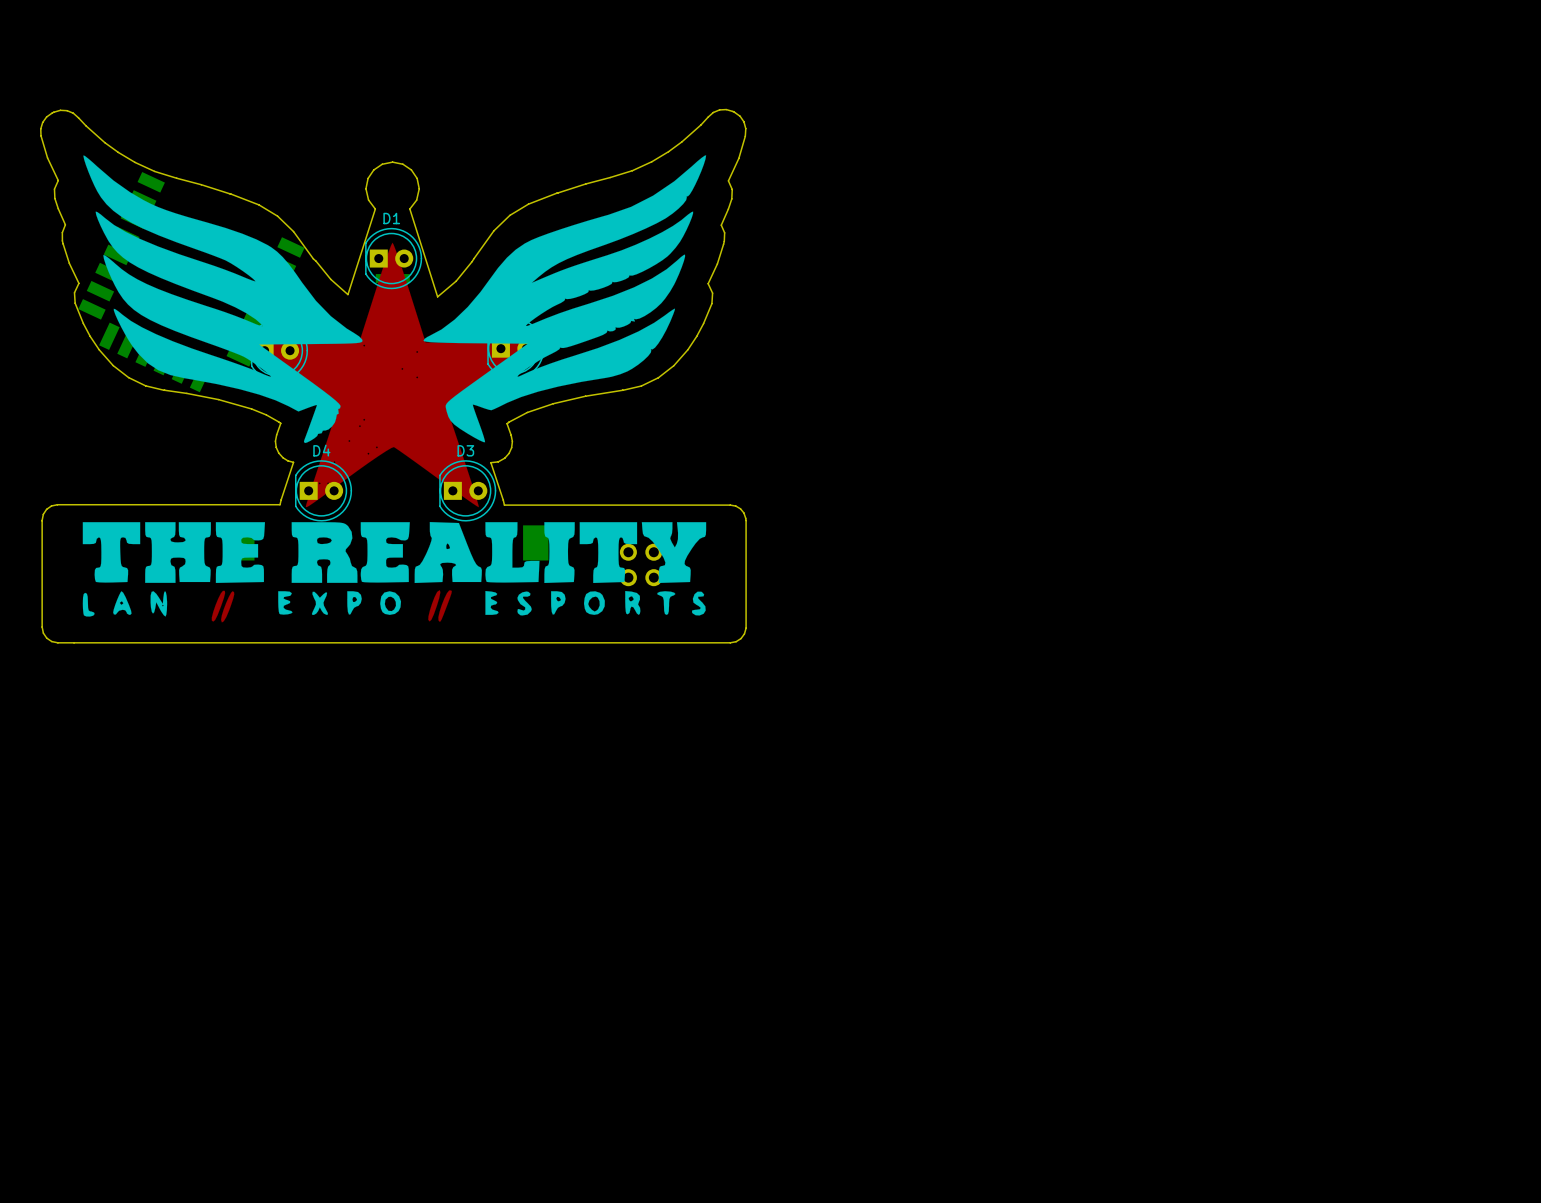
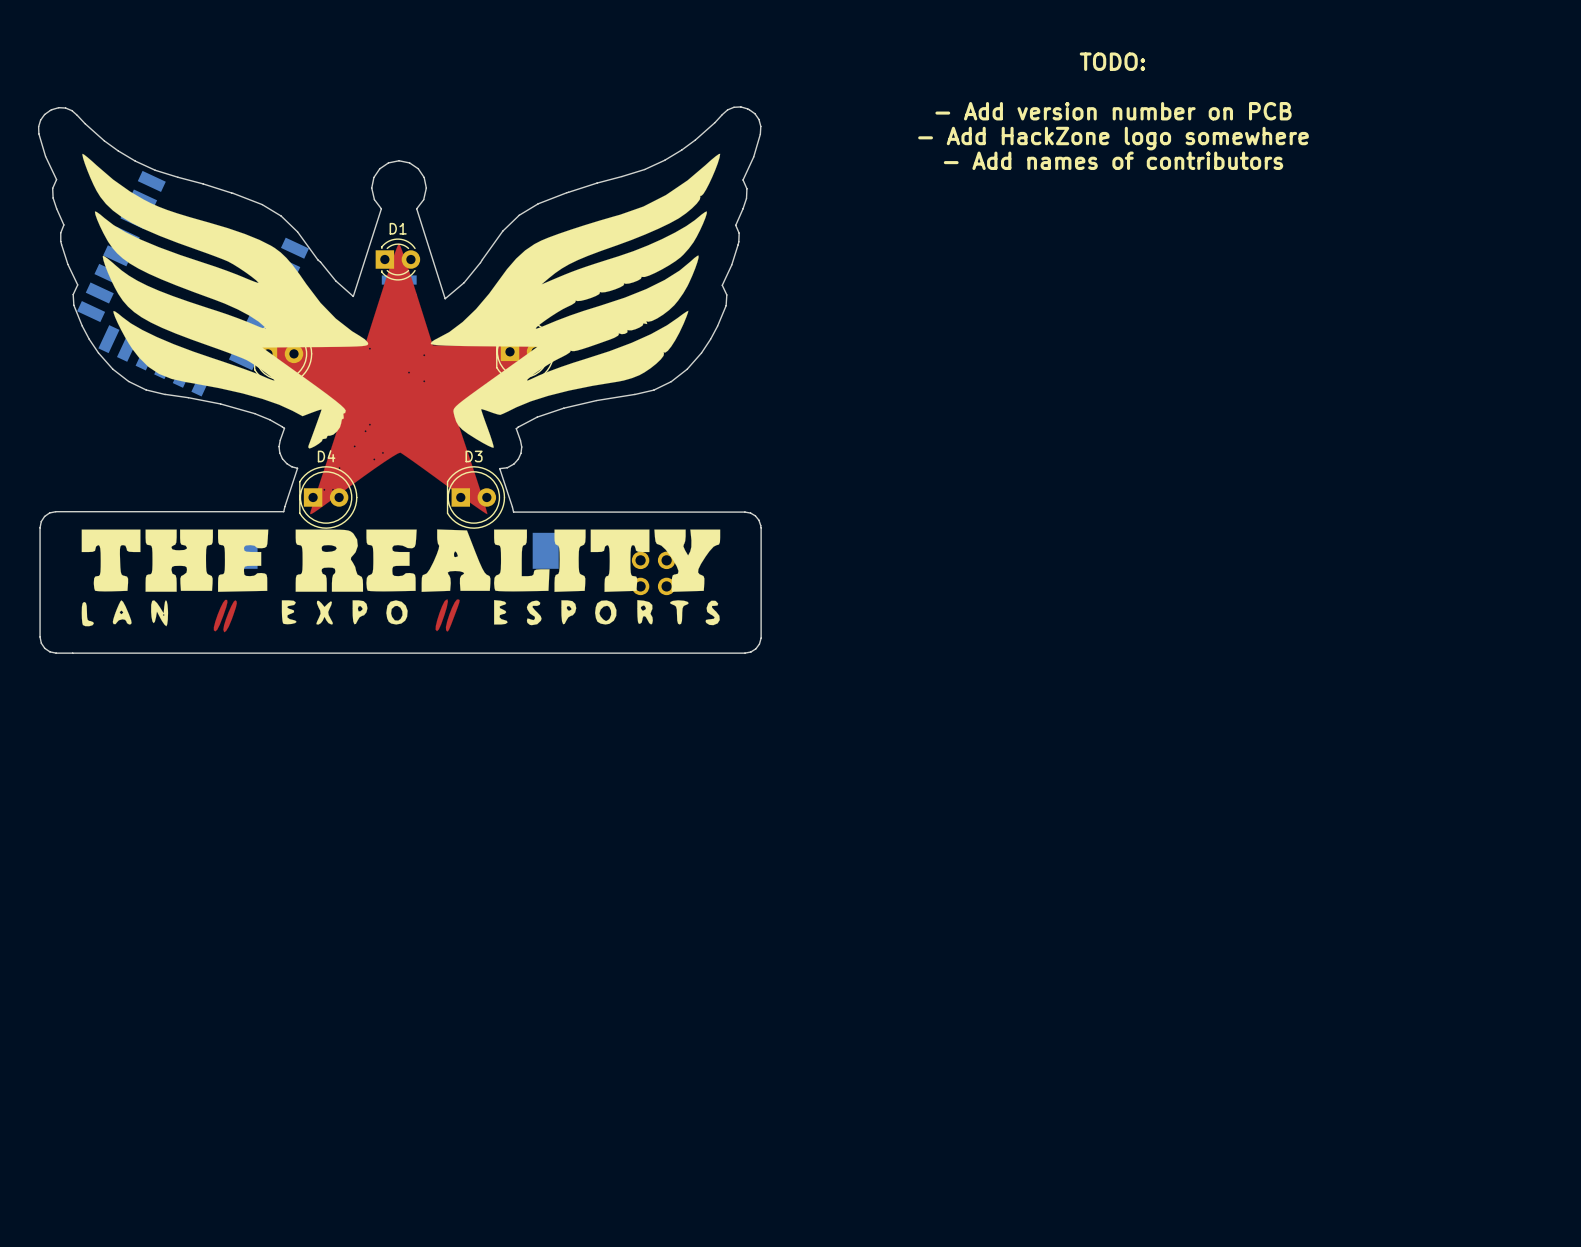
text: none -> TODO: (1112, 61)
text: none -> - Add version number on PCB (1113, 111)
text: none -> - Add HackZone logo somewhere (1113, 138)
text: none -> - Add names of contributors (1113, 160)
D1 footprint: [365, 228, 423, 290] -> [375, 238, 421, 281]

